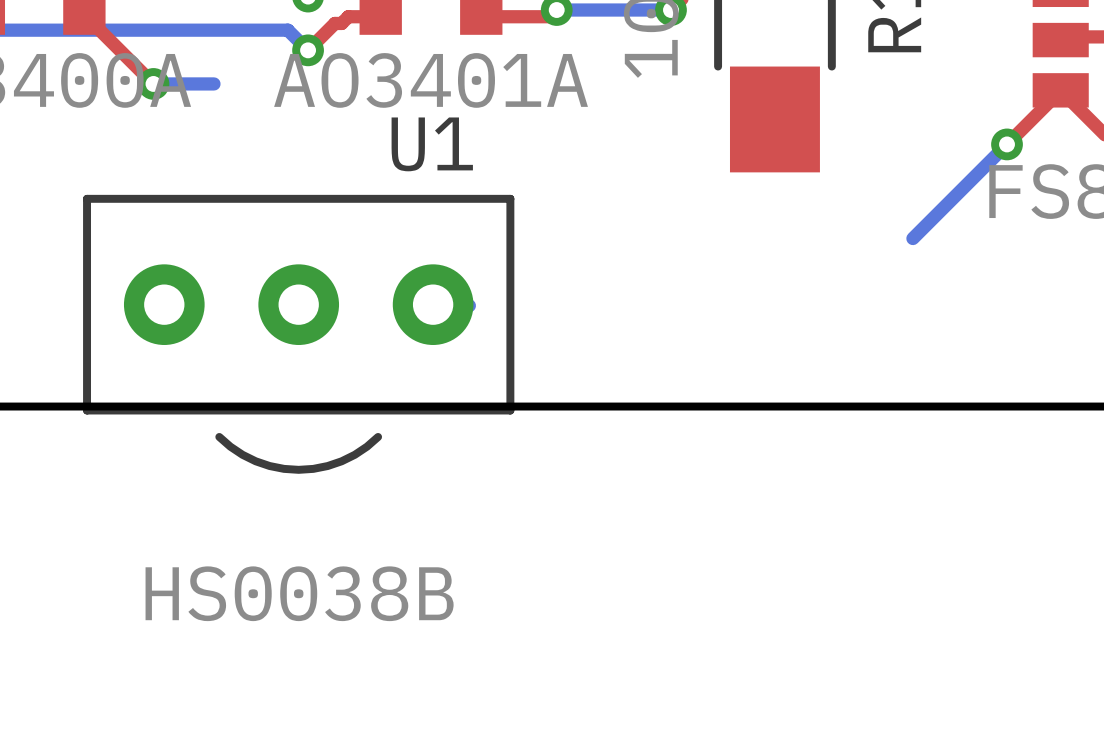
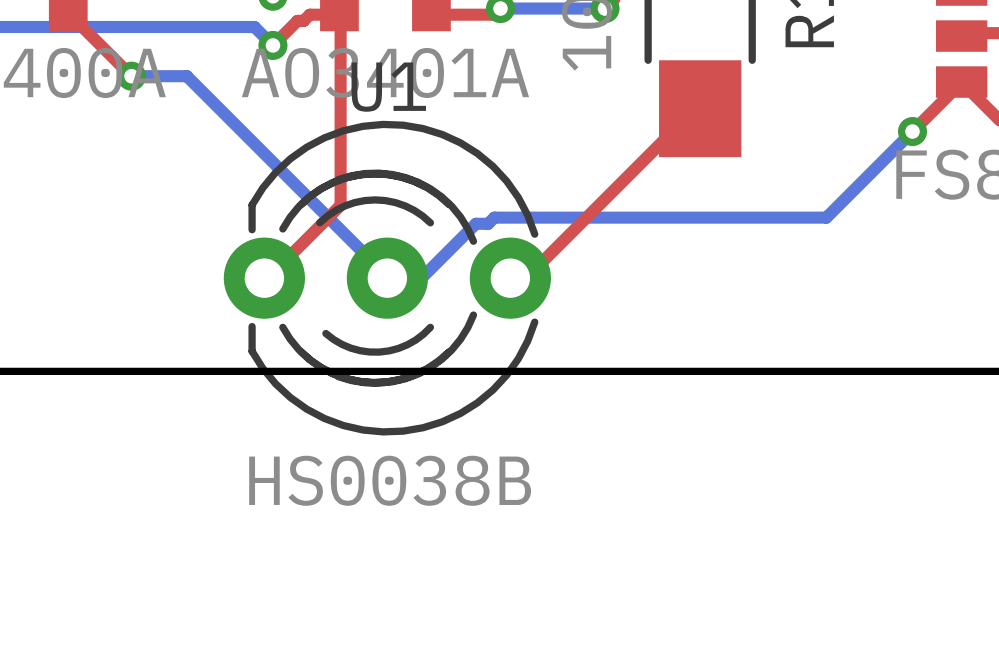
top track: none -> (340, 14) (340, 205) (266, 279)
bottom track: none -> (186, 76) (389, 279)
top track: none -> (697, 106) (525, 279) (510, 278)
U1 name position: U1 (432, 144) -> U1 (388, 87)
U1 footprint: [83, 194, 515, 474] -> [223, 120, 551, 436]
bottom track: none -> (826, 217) (494, 217) (488, 223) (475, 223) (420, 279)

